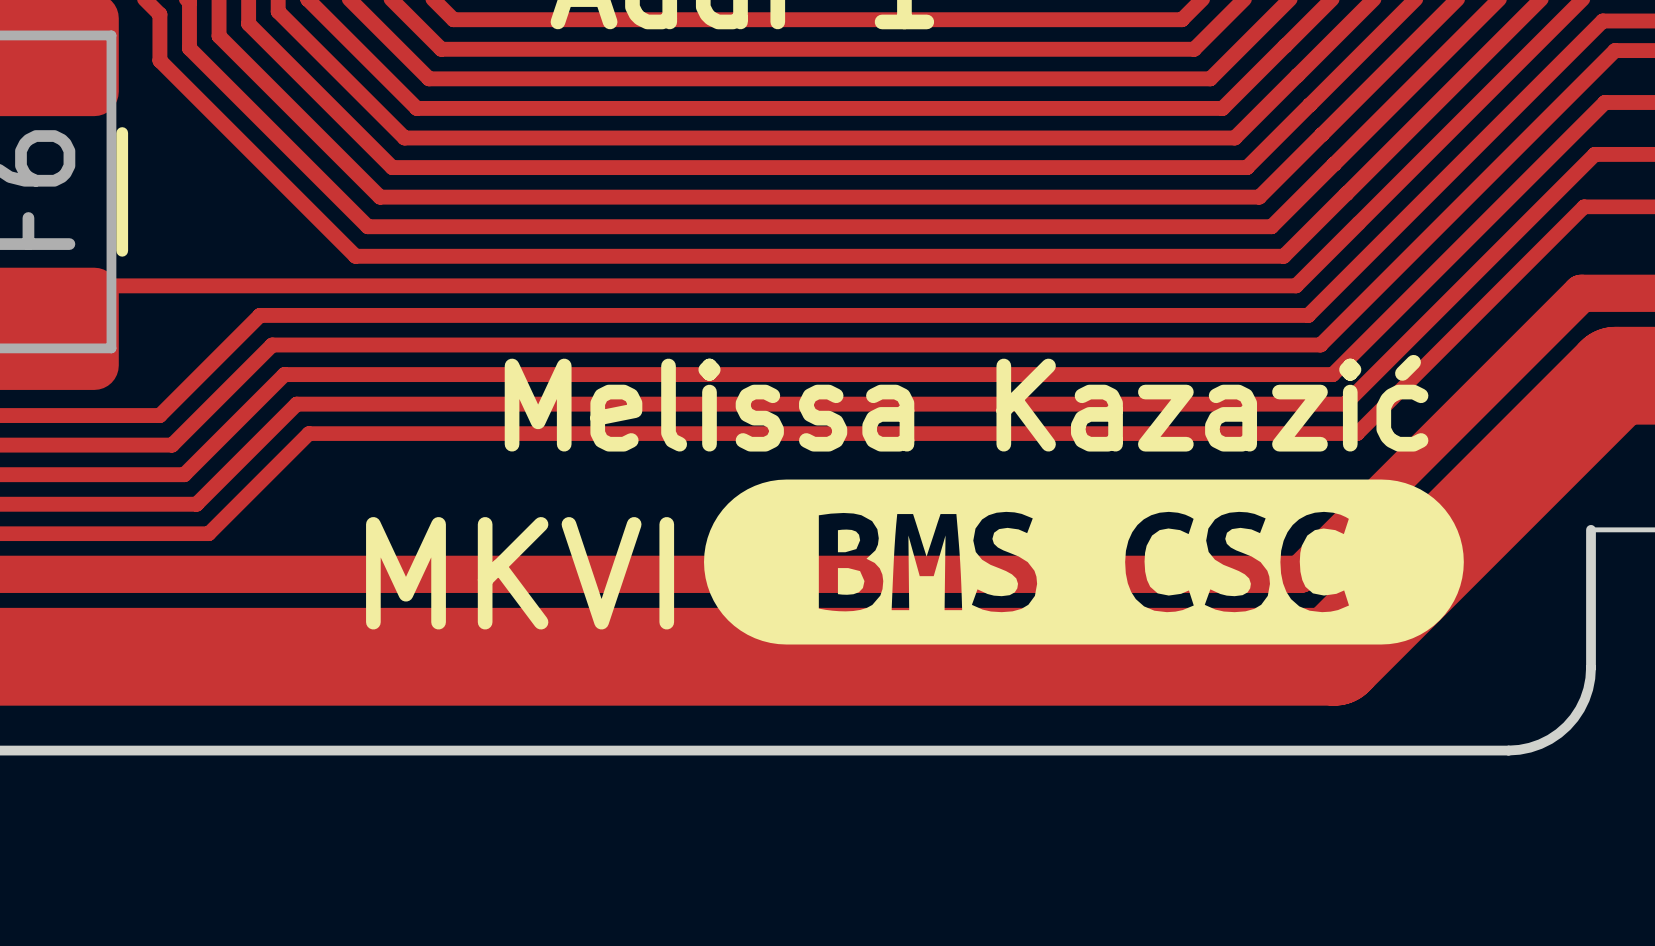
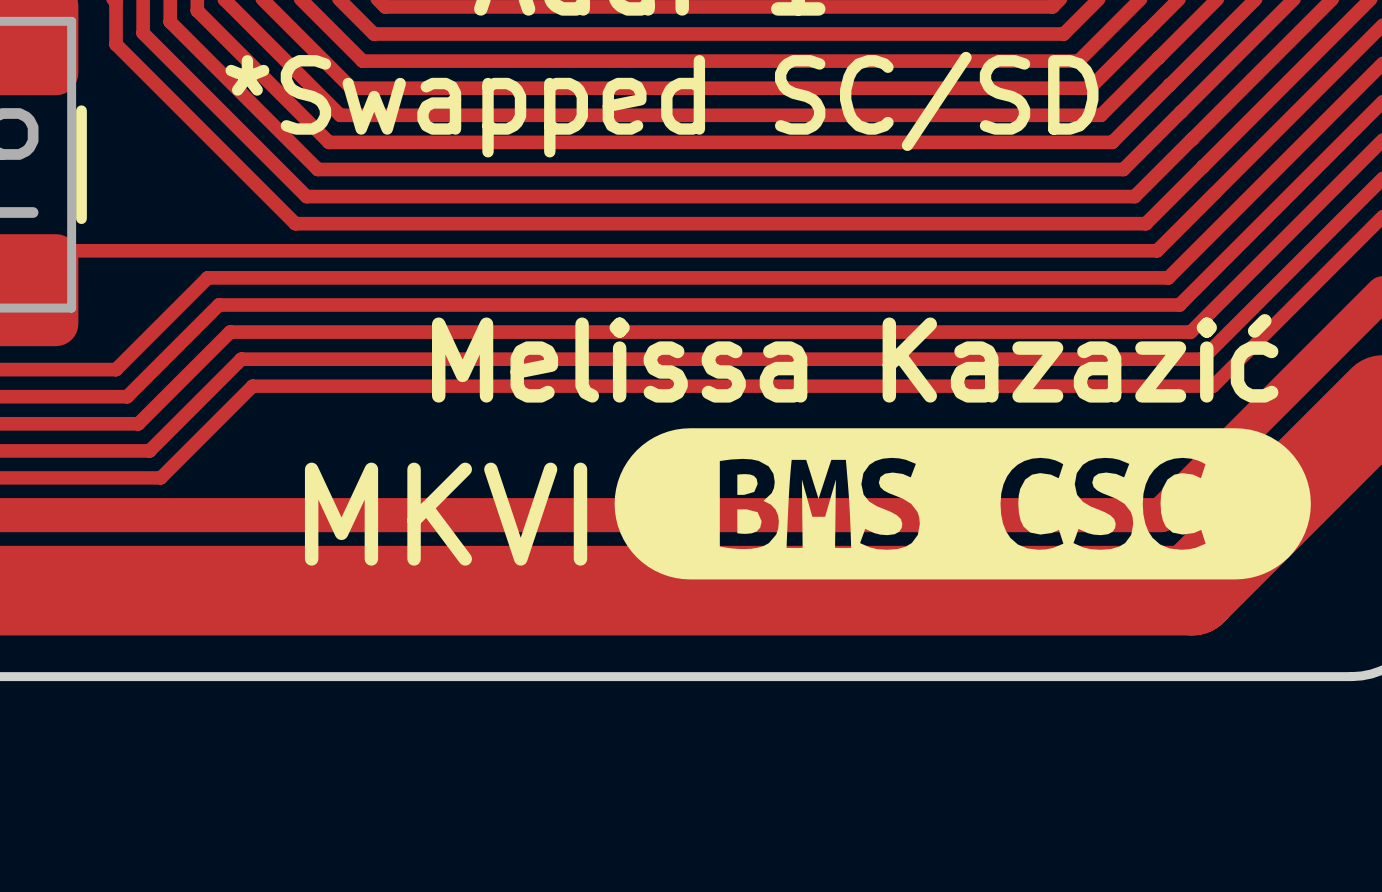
text: none -> *Swapped SC/SD (661, 104)

